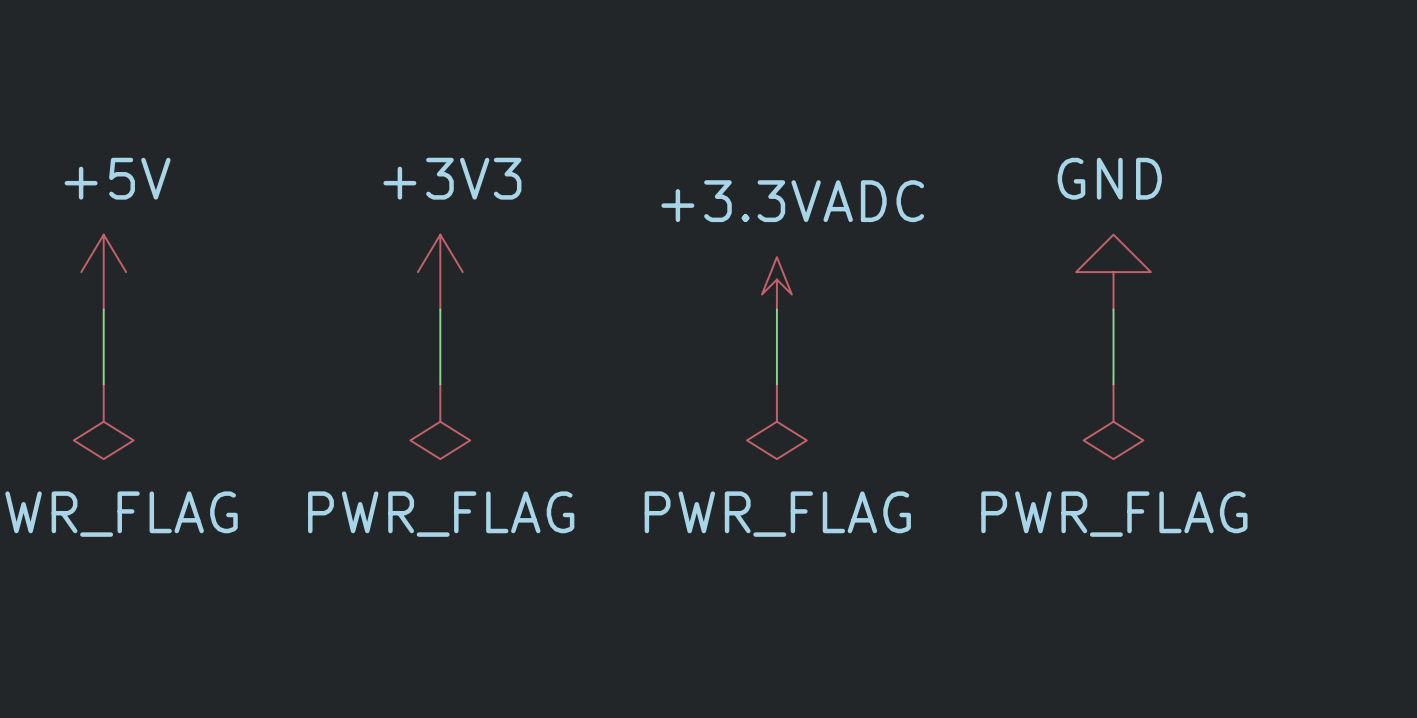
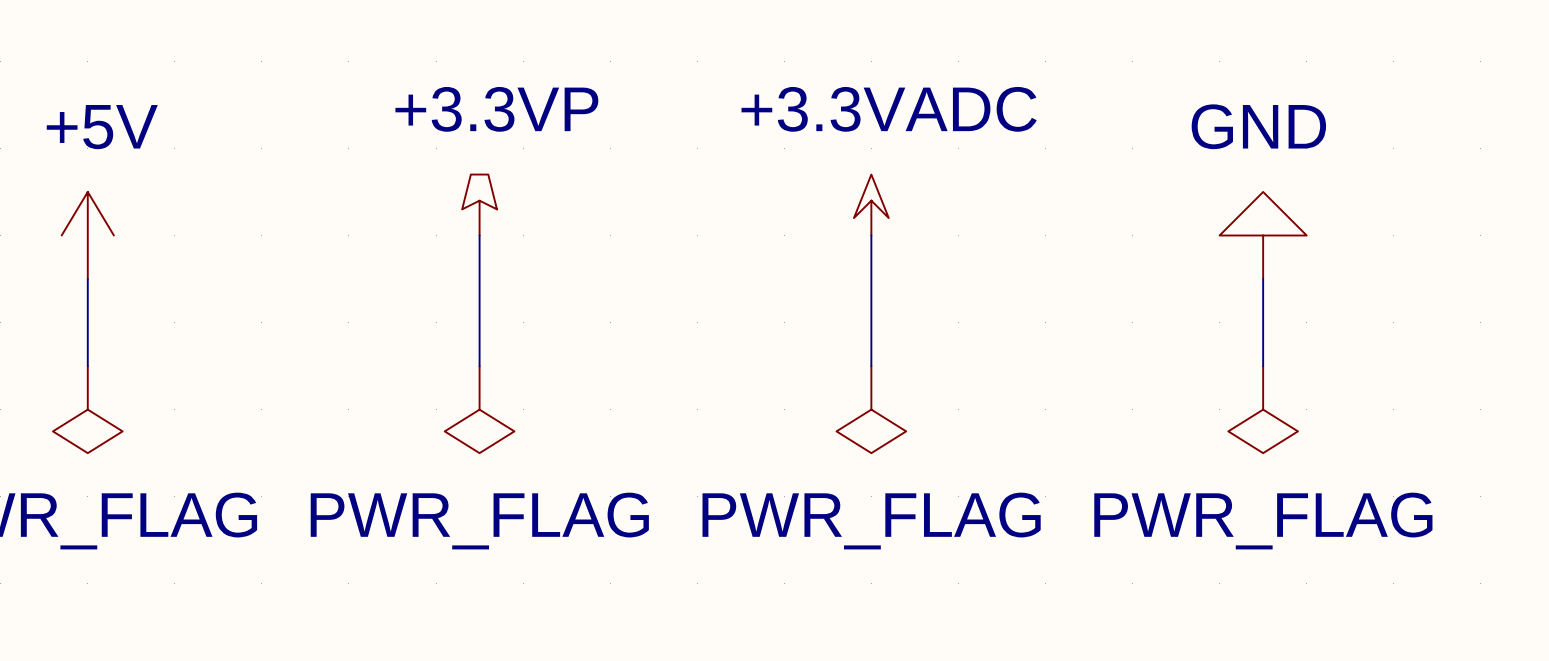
power symbol: +3V3 (440, 272) -> +3.3VP (479, 205)
power symbol position: +3.3VADC (776, 283) -> +3.3VADC (871, 205)

